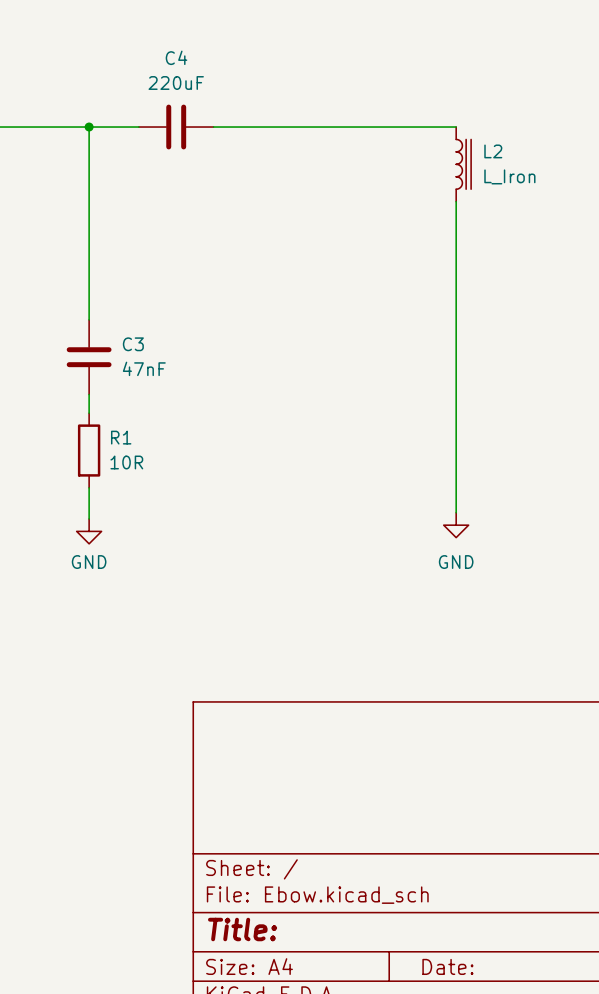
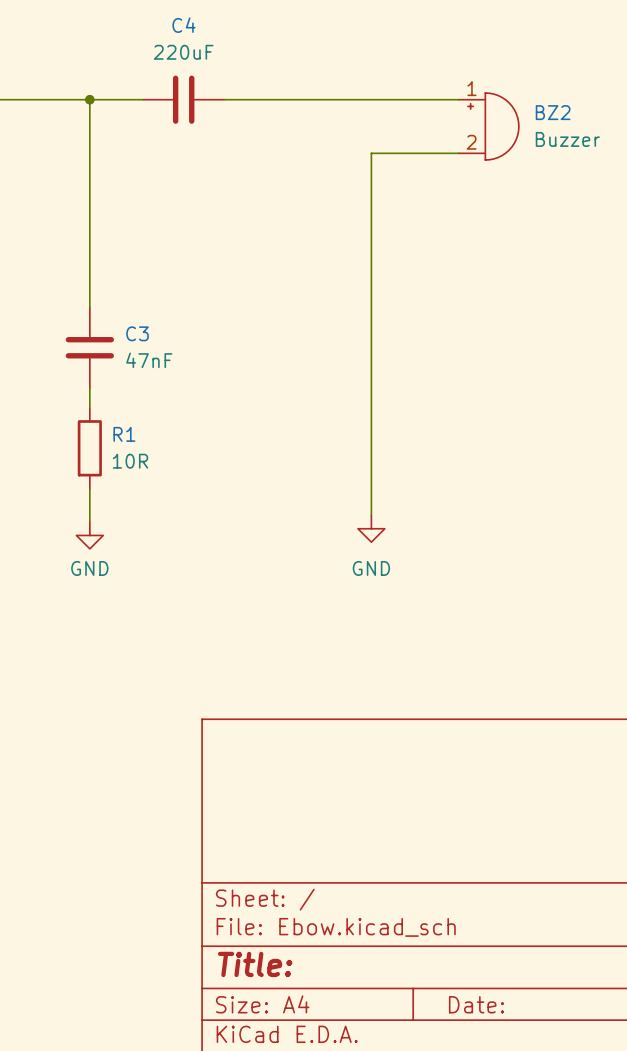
BZ2: none -> Buzzer (488, 126)
L2: L_Iron (463, 164) -> none
wire: none -> (458, 153) (371, 153) (371, 515)
wire: (456, 201) (456, 512) -> none
power symbol position: GND (456, 525) -> GND (371, 528)

